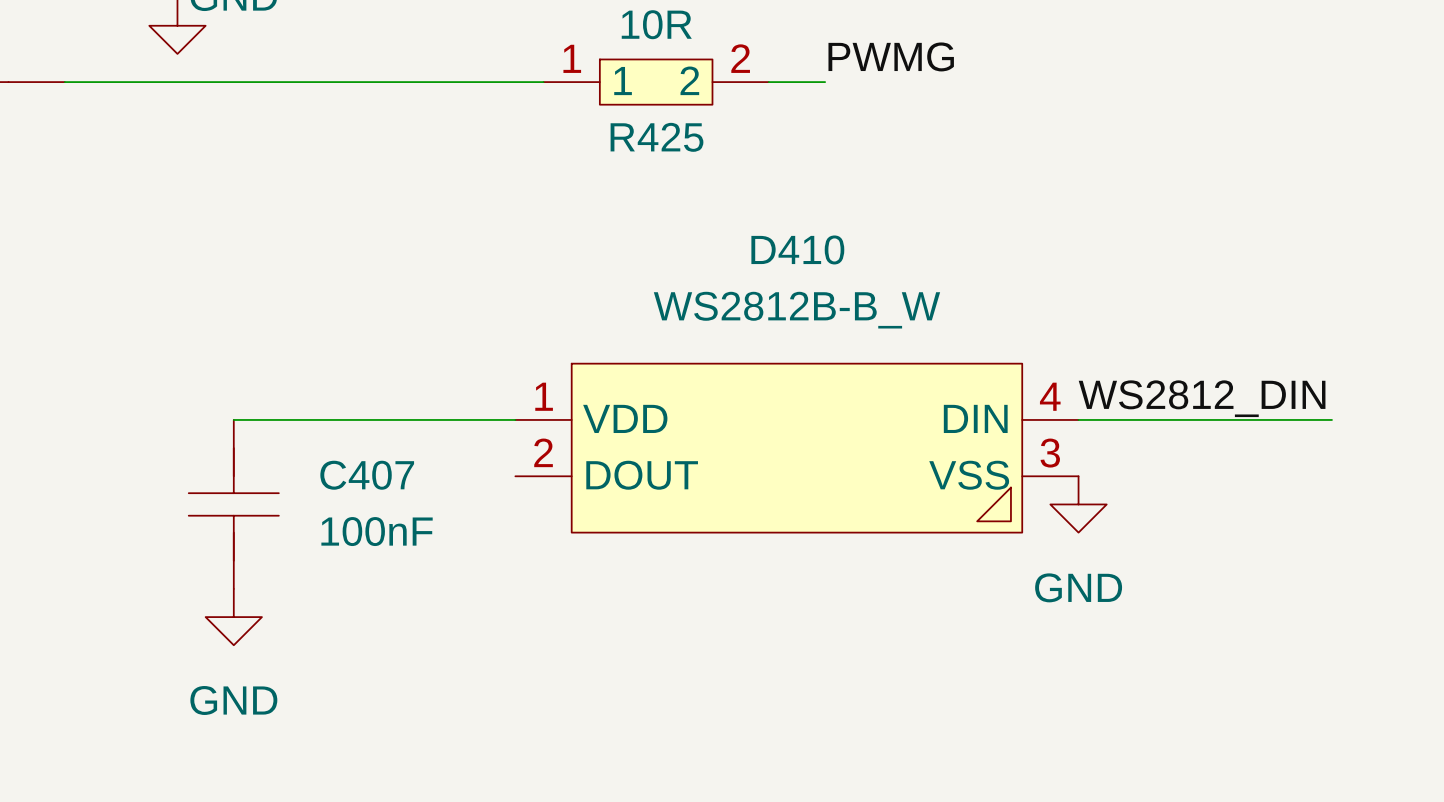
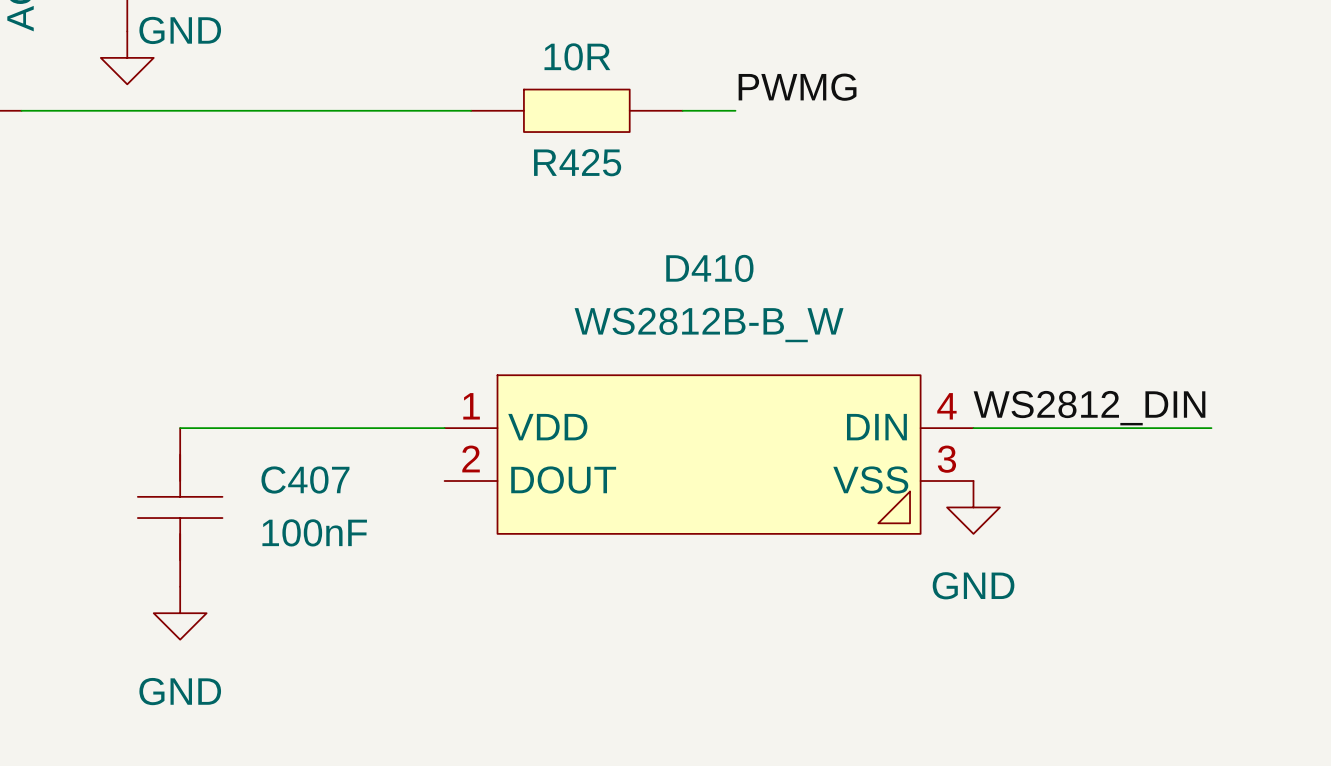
R425 pin number: 1 (572, 58) -> none
R425 pin number: 2 (740, 58) -> none
R425 pin name: 2 (689, 80) -> none
R425 pin name: 1 (623, 81) -> none

